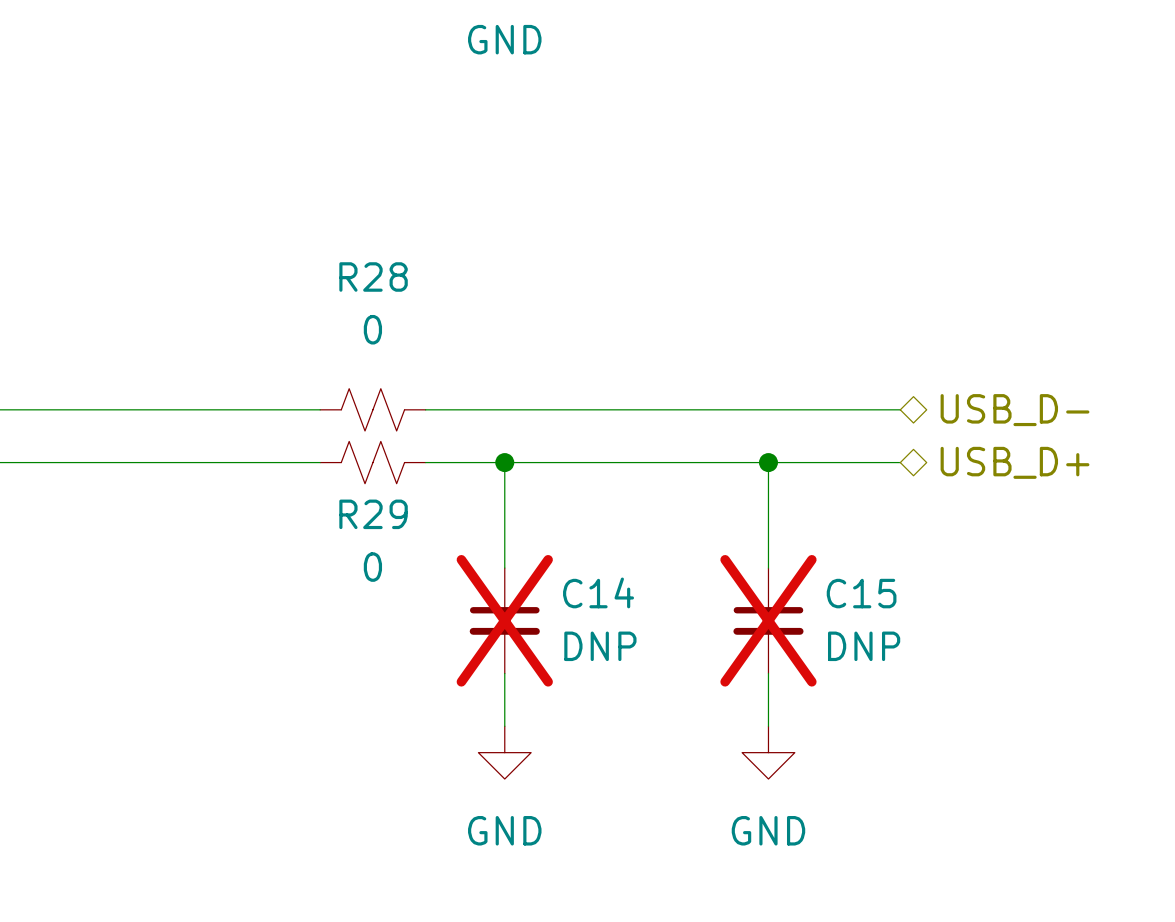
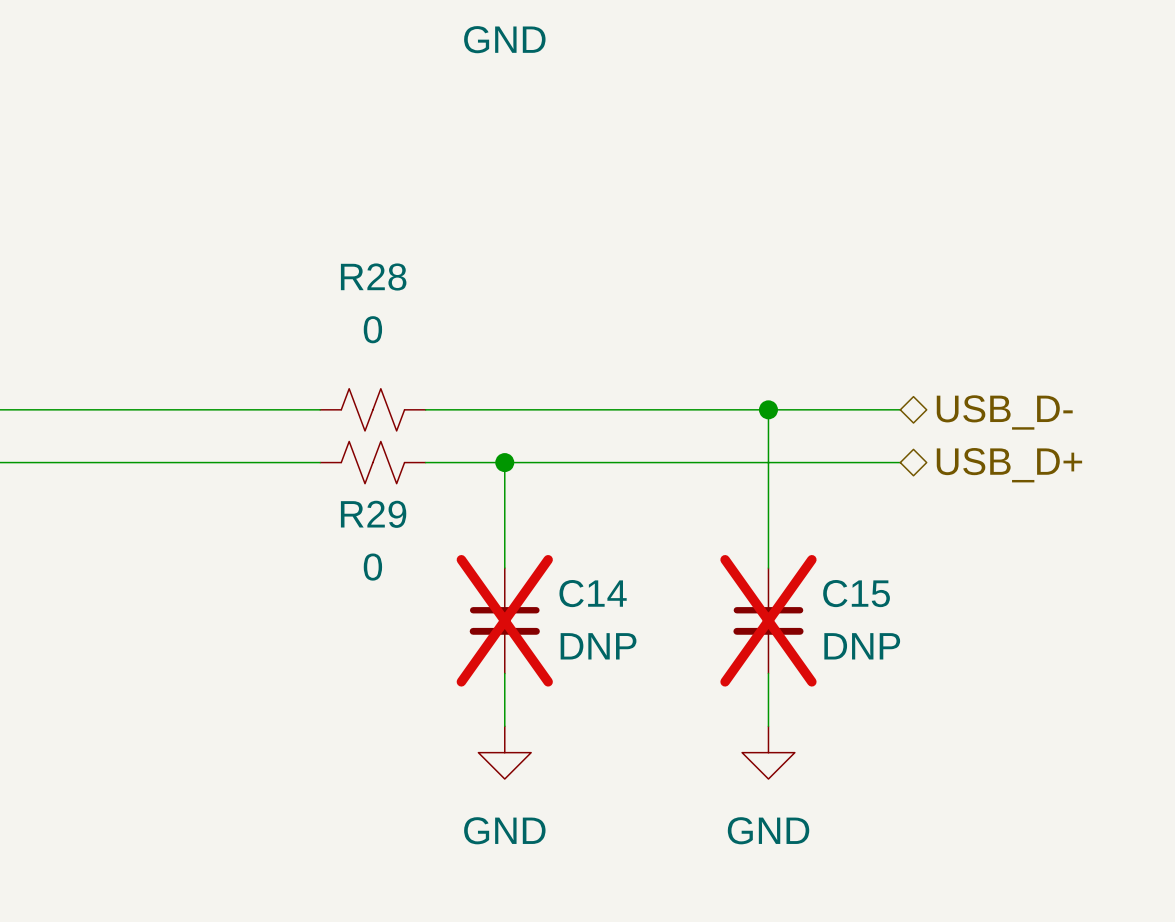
wire: none -> (768, 409) (768, 462)
junction position: (768, 462) -> (768, 409)

